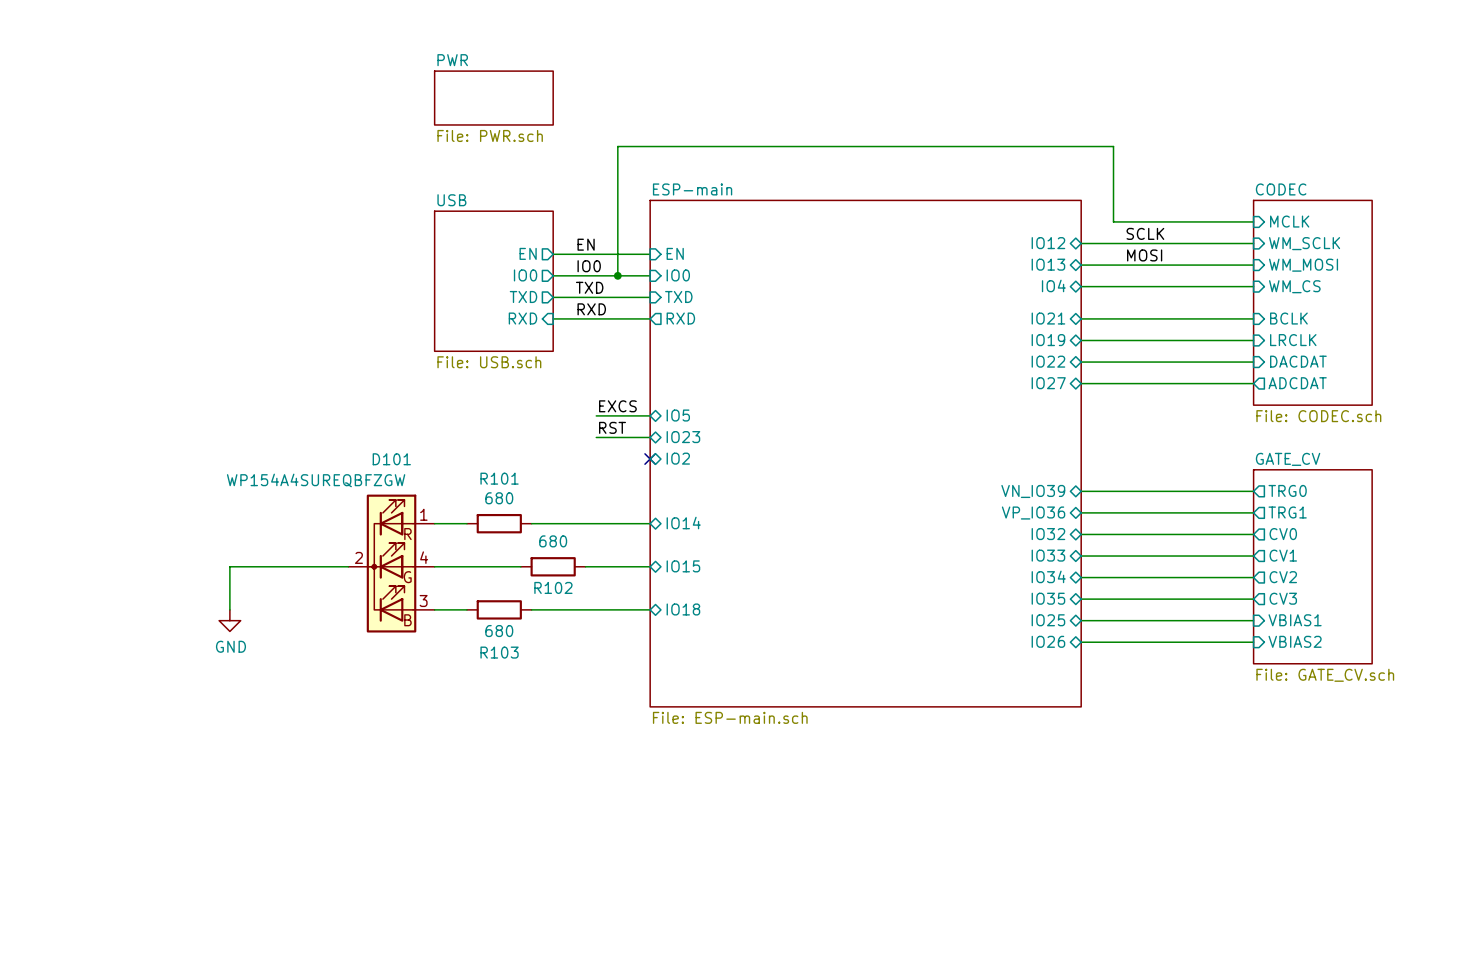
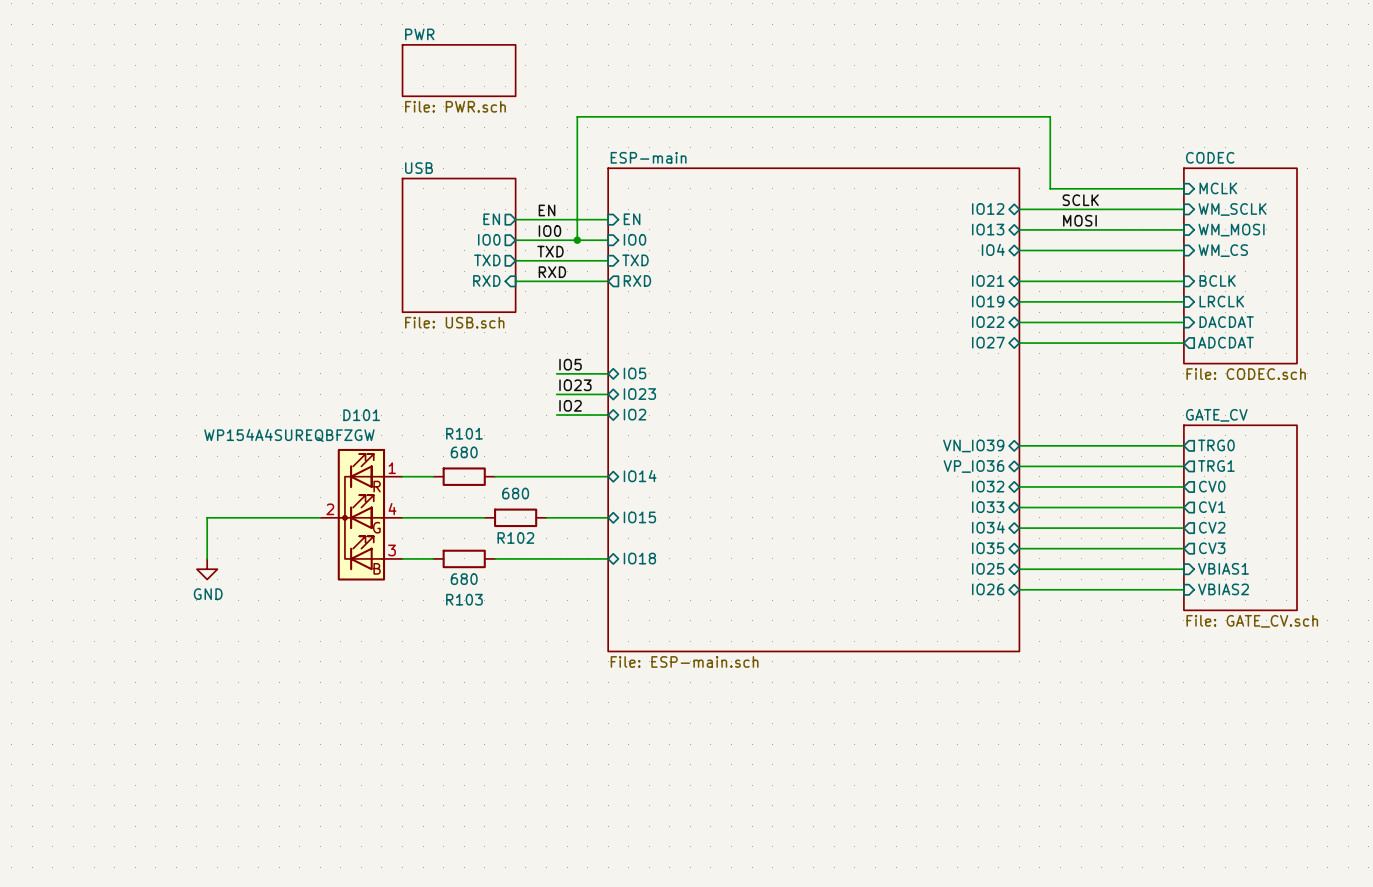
label: EXCS (617, 406) -> IO5 (570, 364)
label: RST (612, 427) -> IO23 (575, 385)
label: none -> IO2 (570, 405)
wire: none -> (556, 415) (608, 415)
no-connect mark: (650, 459) -> none

